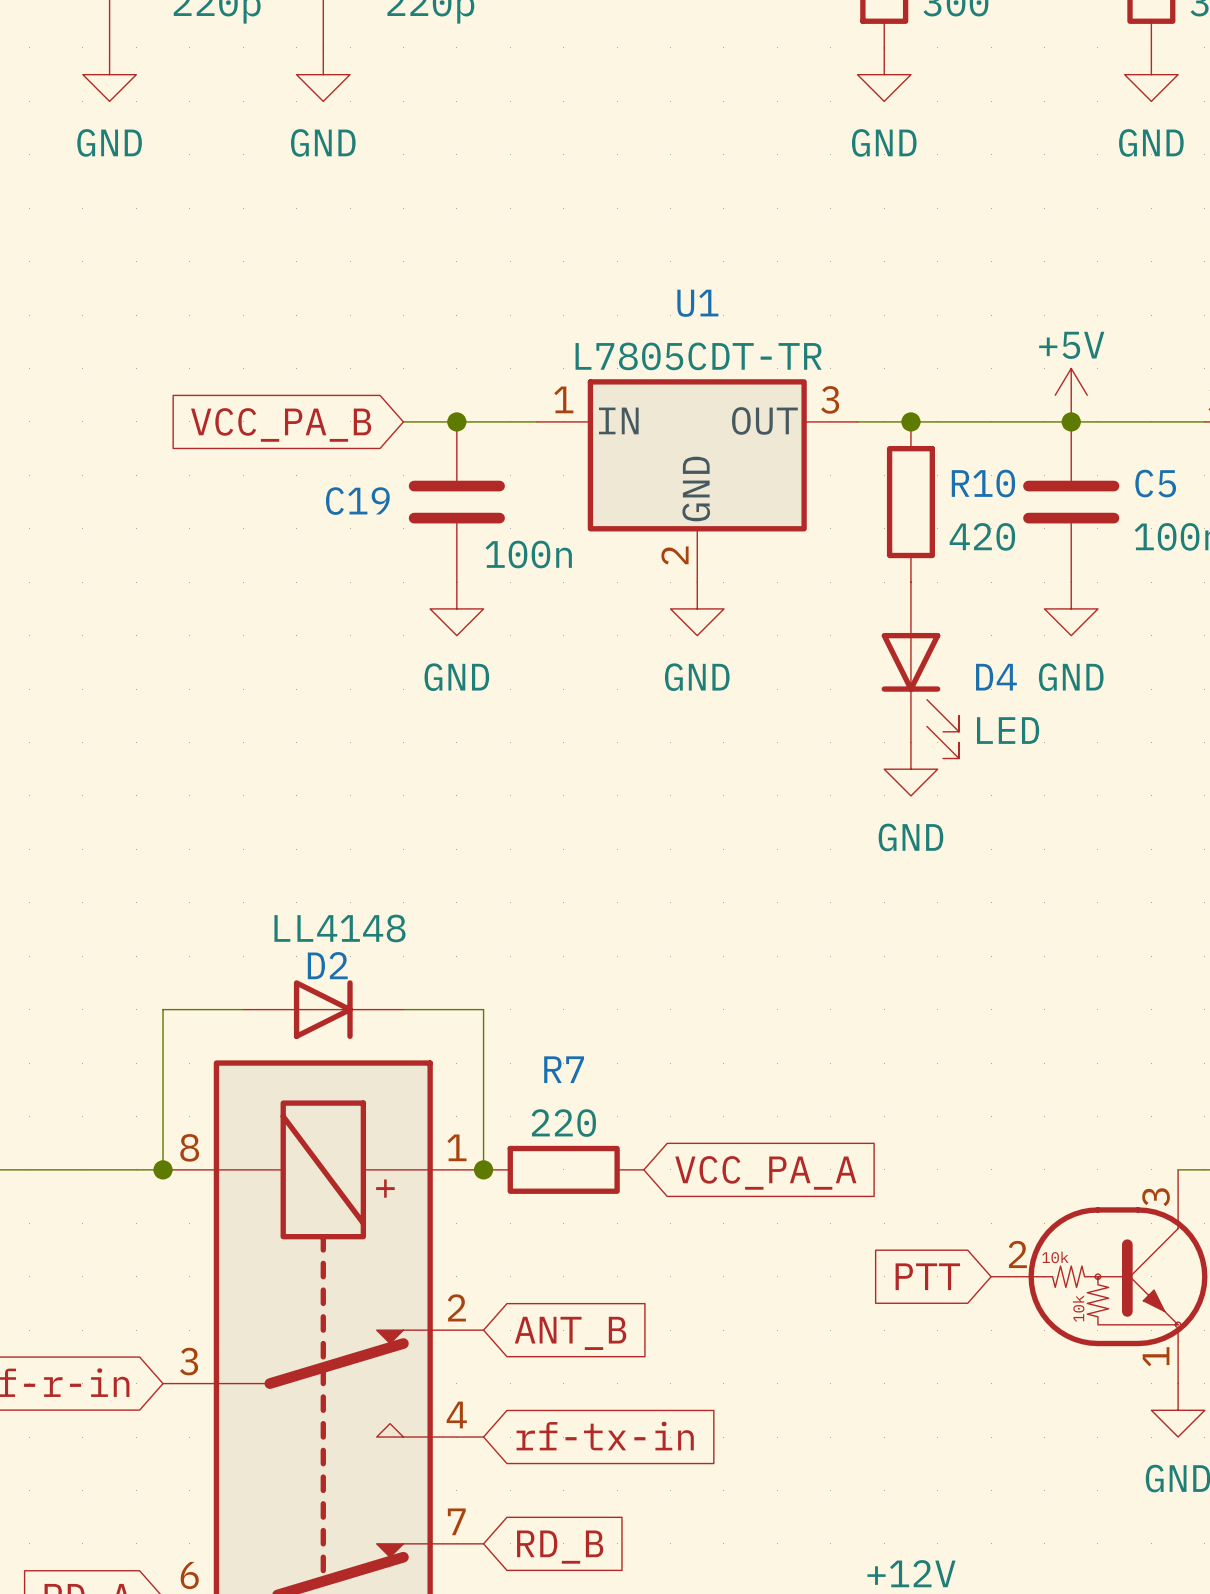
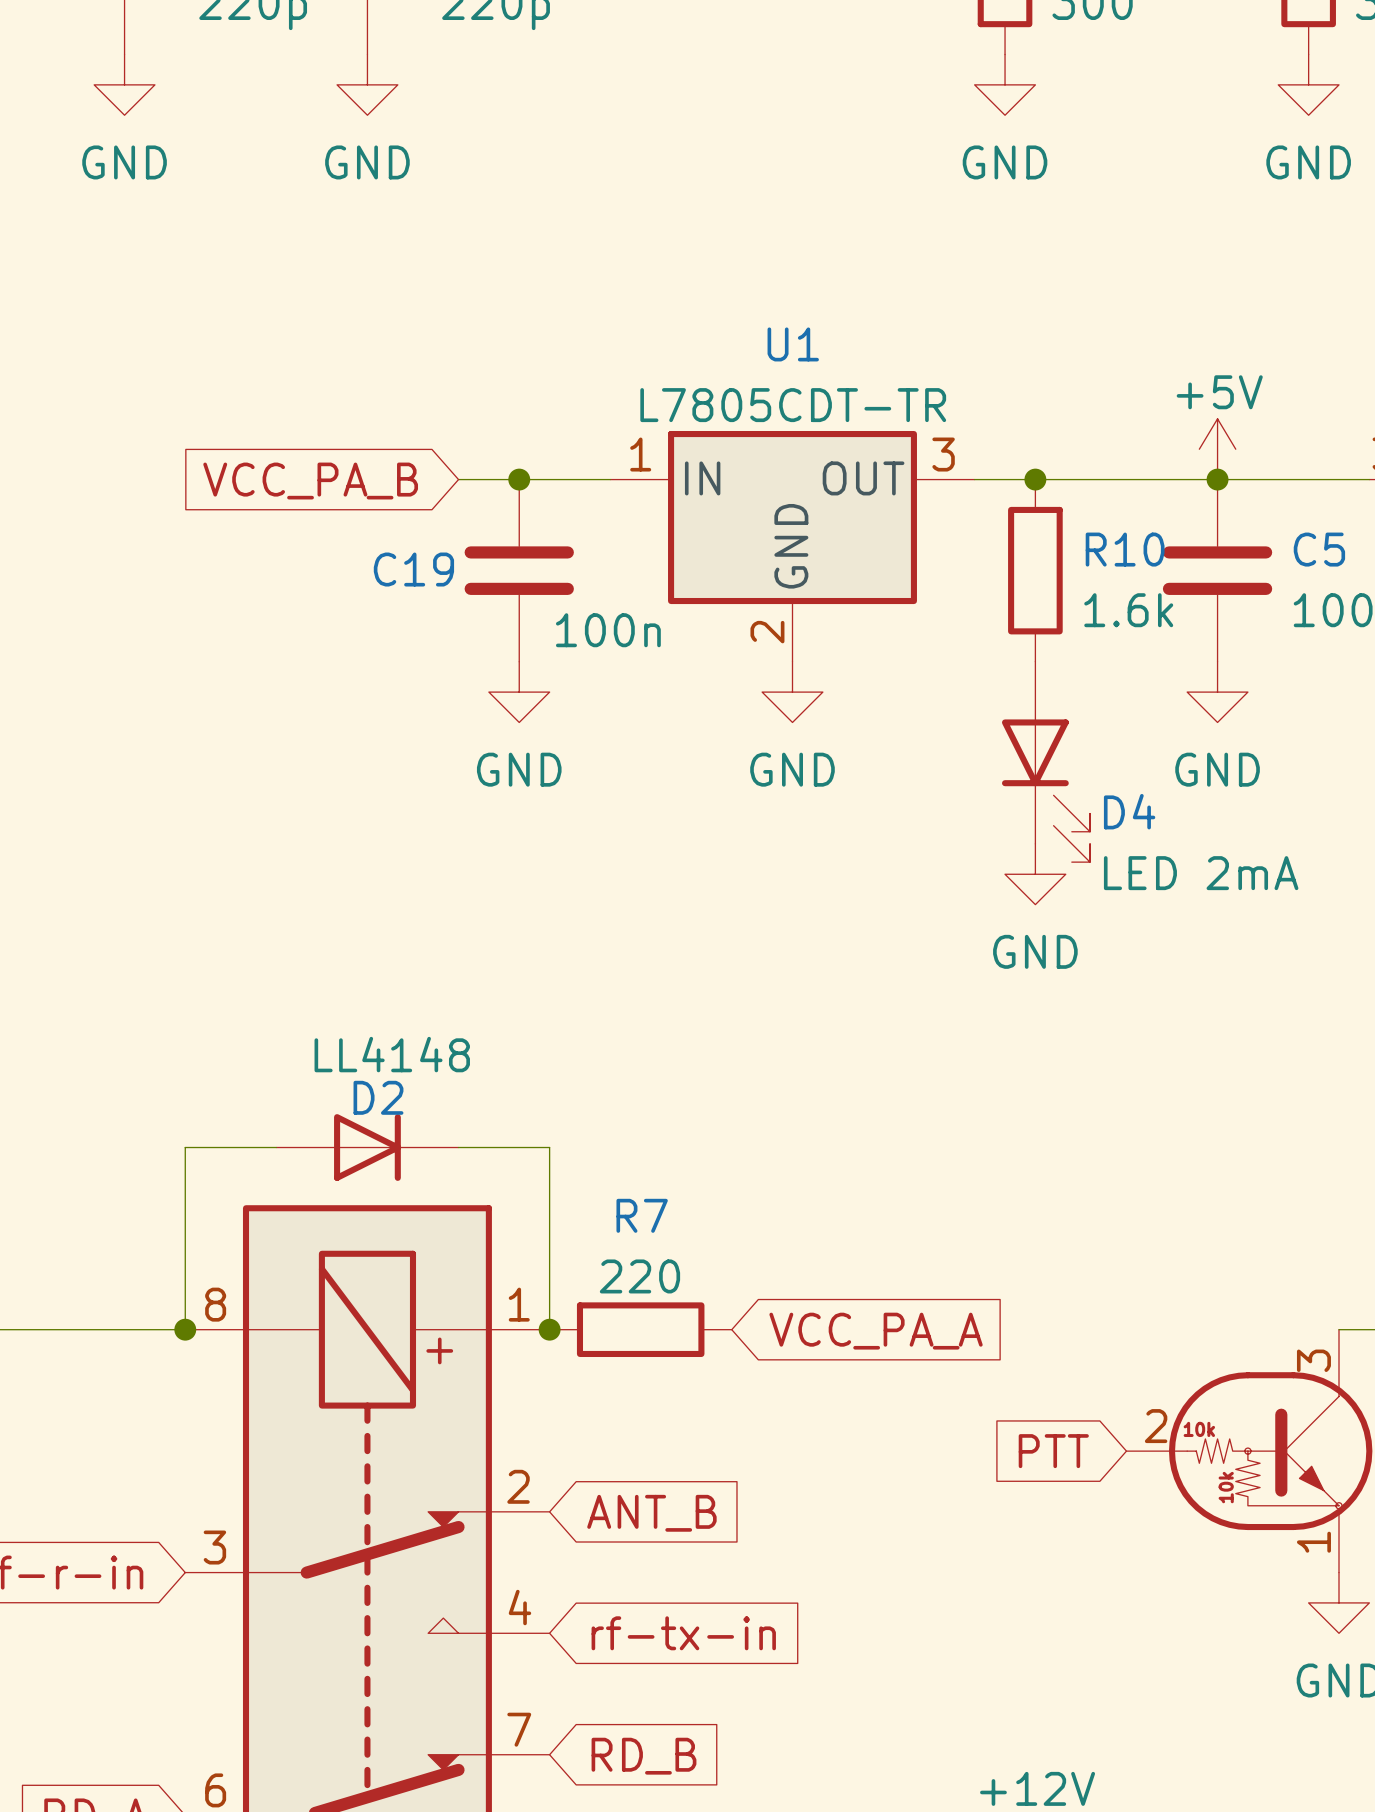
R10 value: 420 (982, 536) -> 1.6k (1128, 610)
D4 name position: D4 (996, 677) -> D4 (1129, 811)
D4 value: LED (1008, 730) -> LED 2mA (1201, 873)

